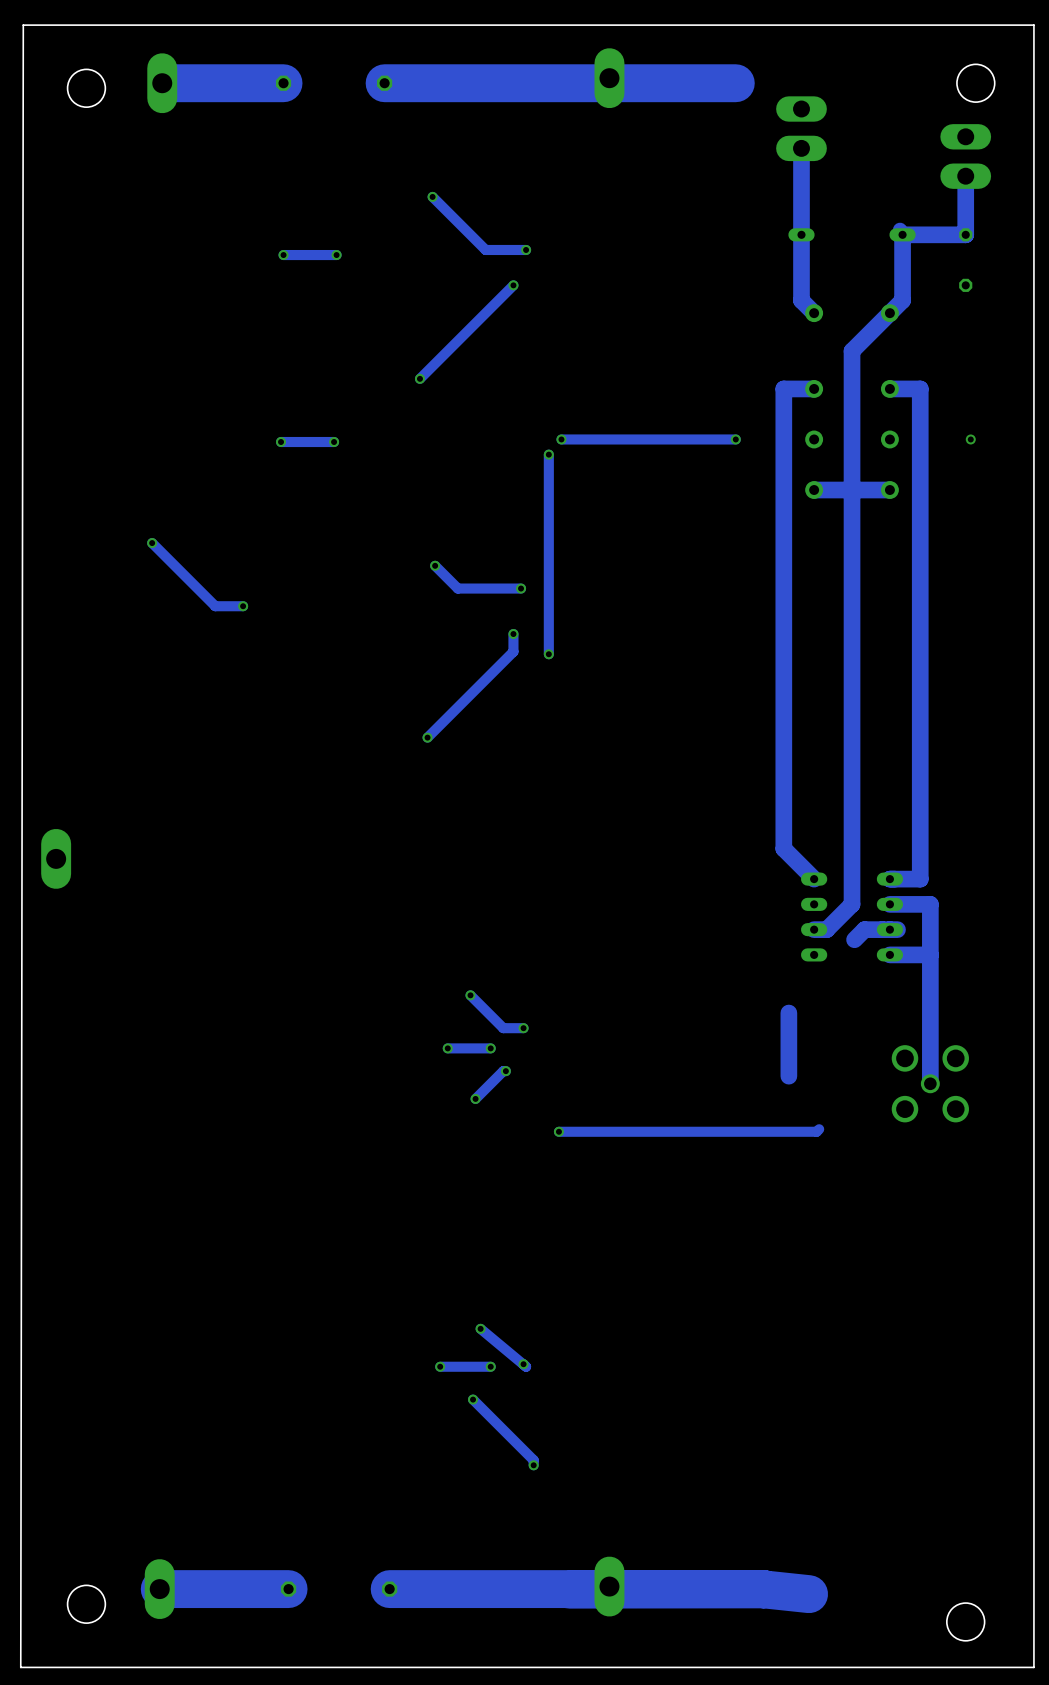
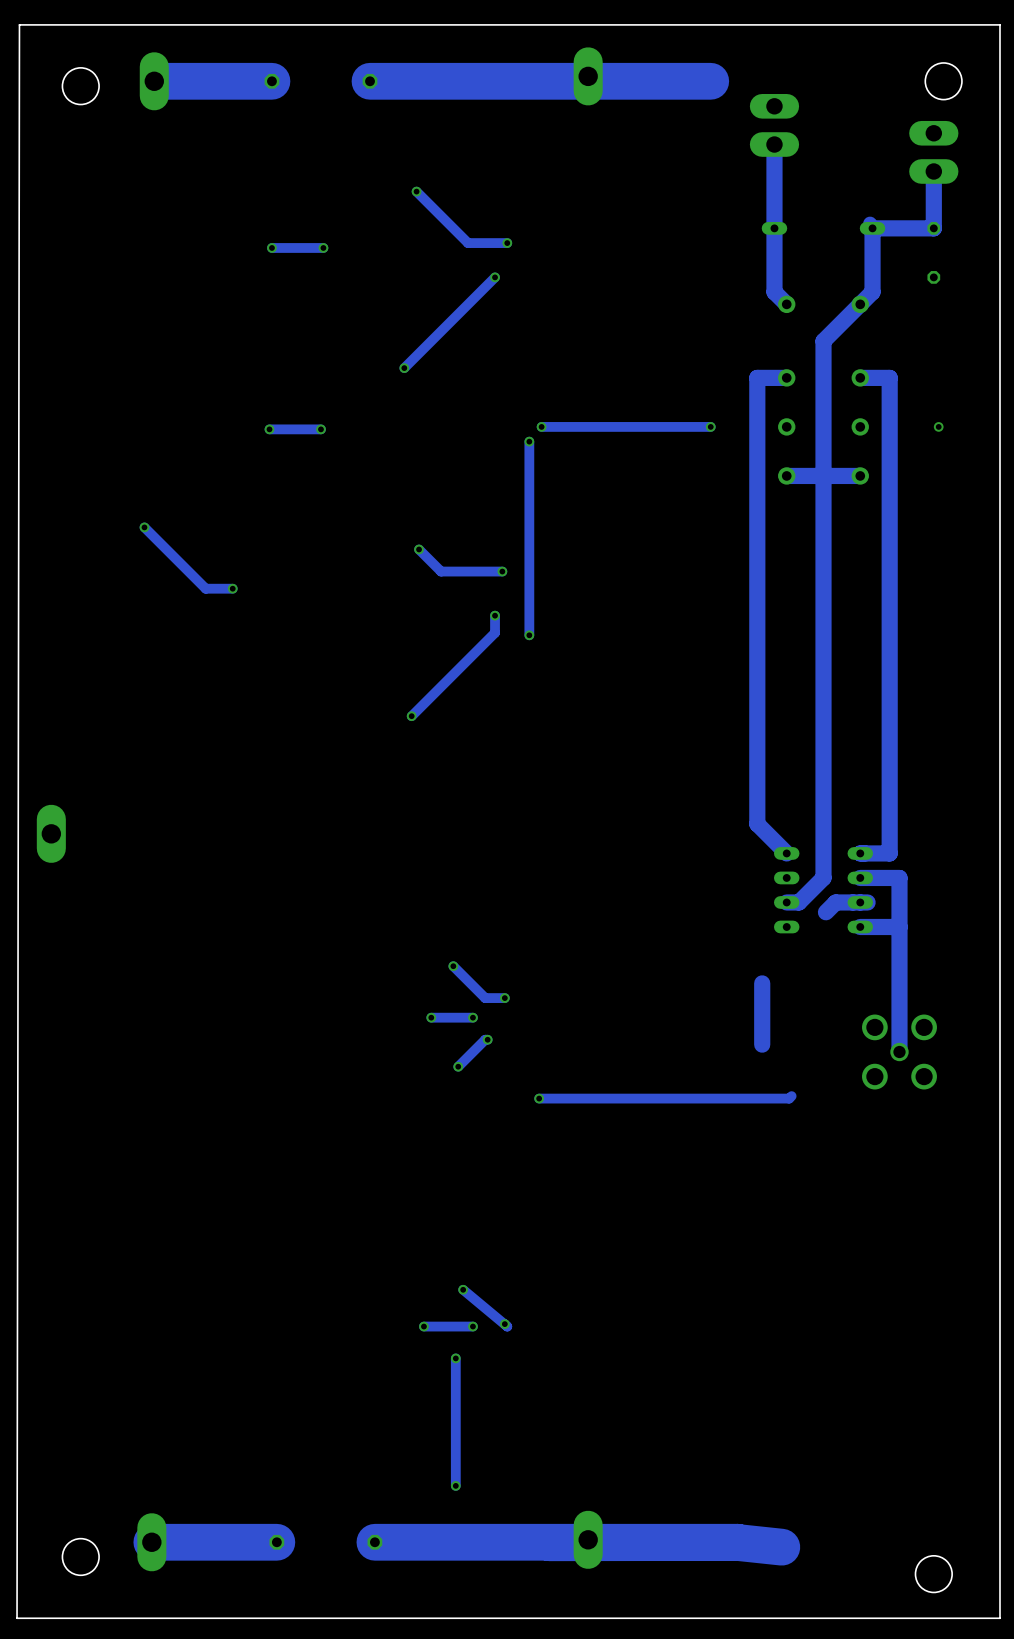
track: (473, 1399) (533, 1460) (533, 1465) -> (455, 1358) (455, 1485)
via: (533, 1465) -> none
via: none -> (455, 1485)

